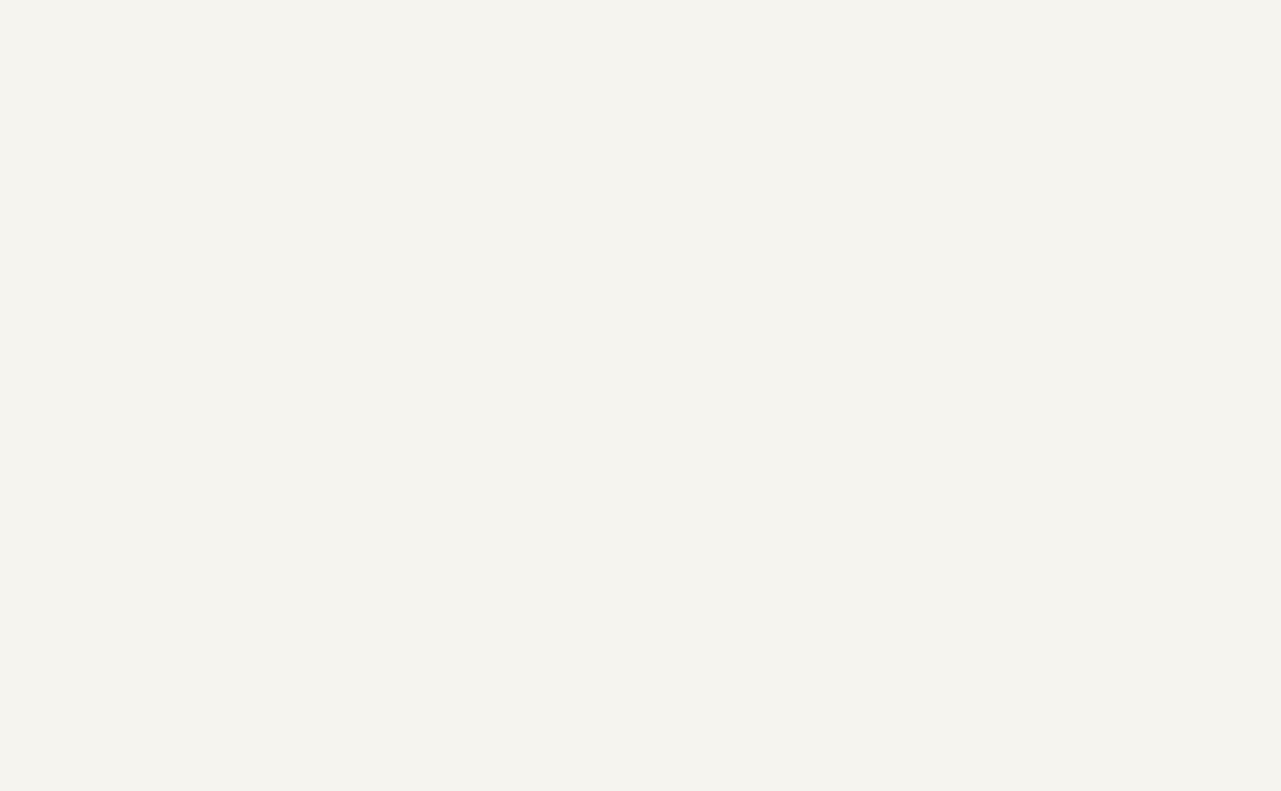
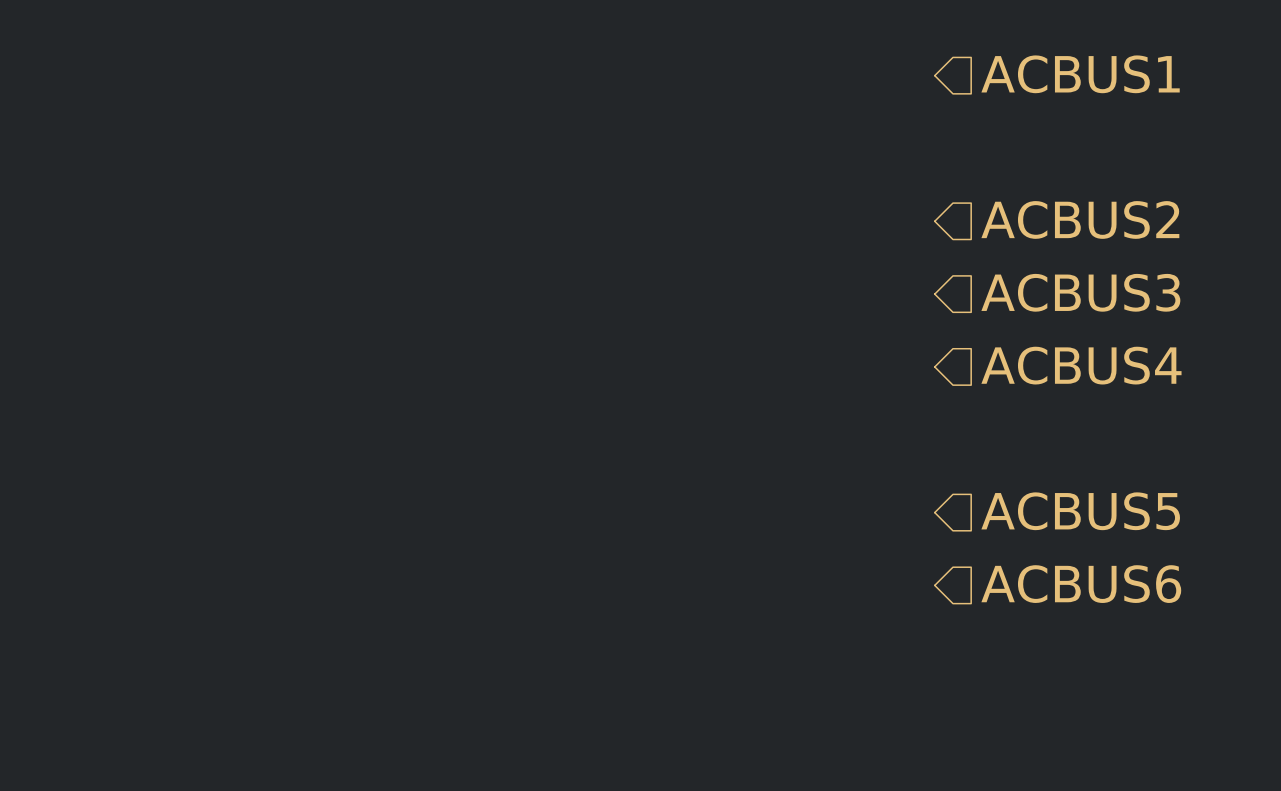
hierarchical label: none -> ACBUS1 (1080, 74)
hierarchical label: none -> ACBUS2 (1080, 219)
hierarchical label: none -> ACBUS3 (1080, 292)
hierarchical label: none -> ACBUS4 (1081, 365)
hierarchical label: none -> ACBUS5 (1080, 511)
hierarchical label: none -> ACBUS6 (1081, 584)

